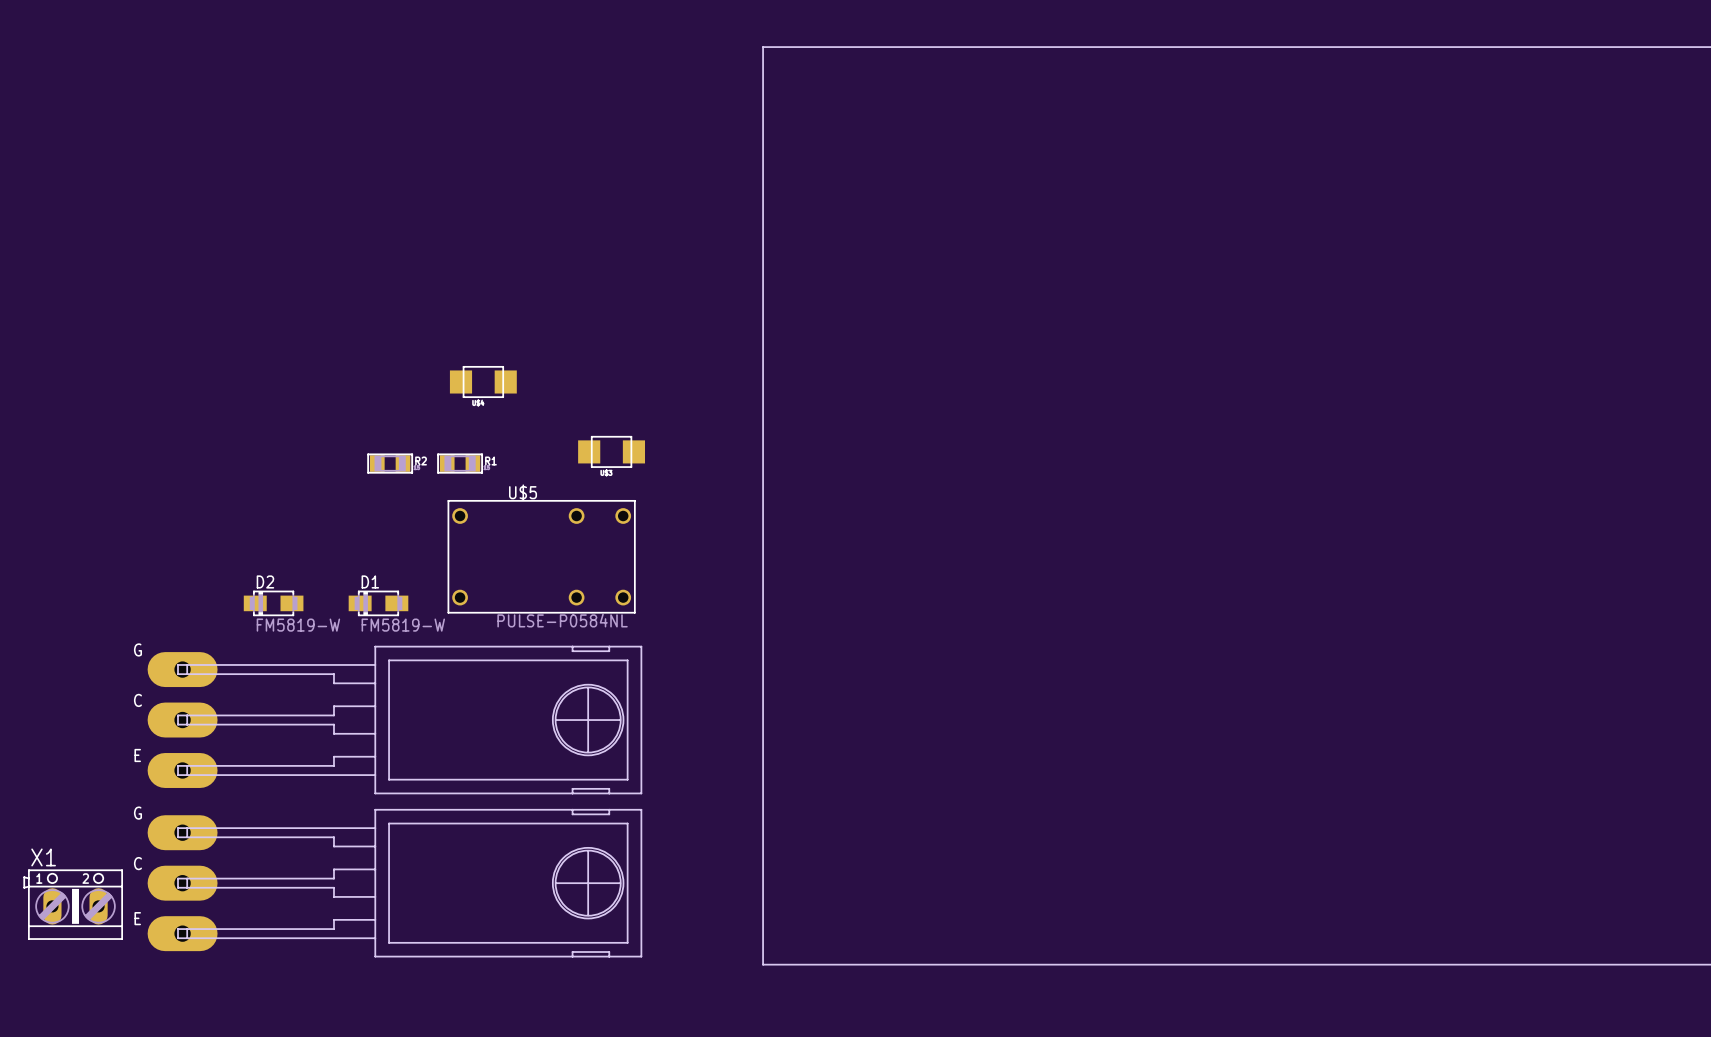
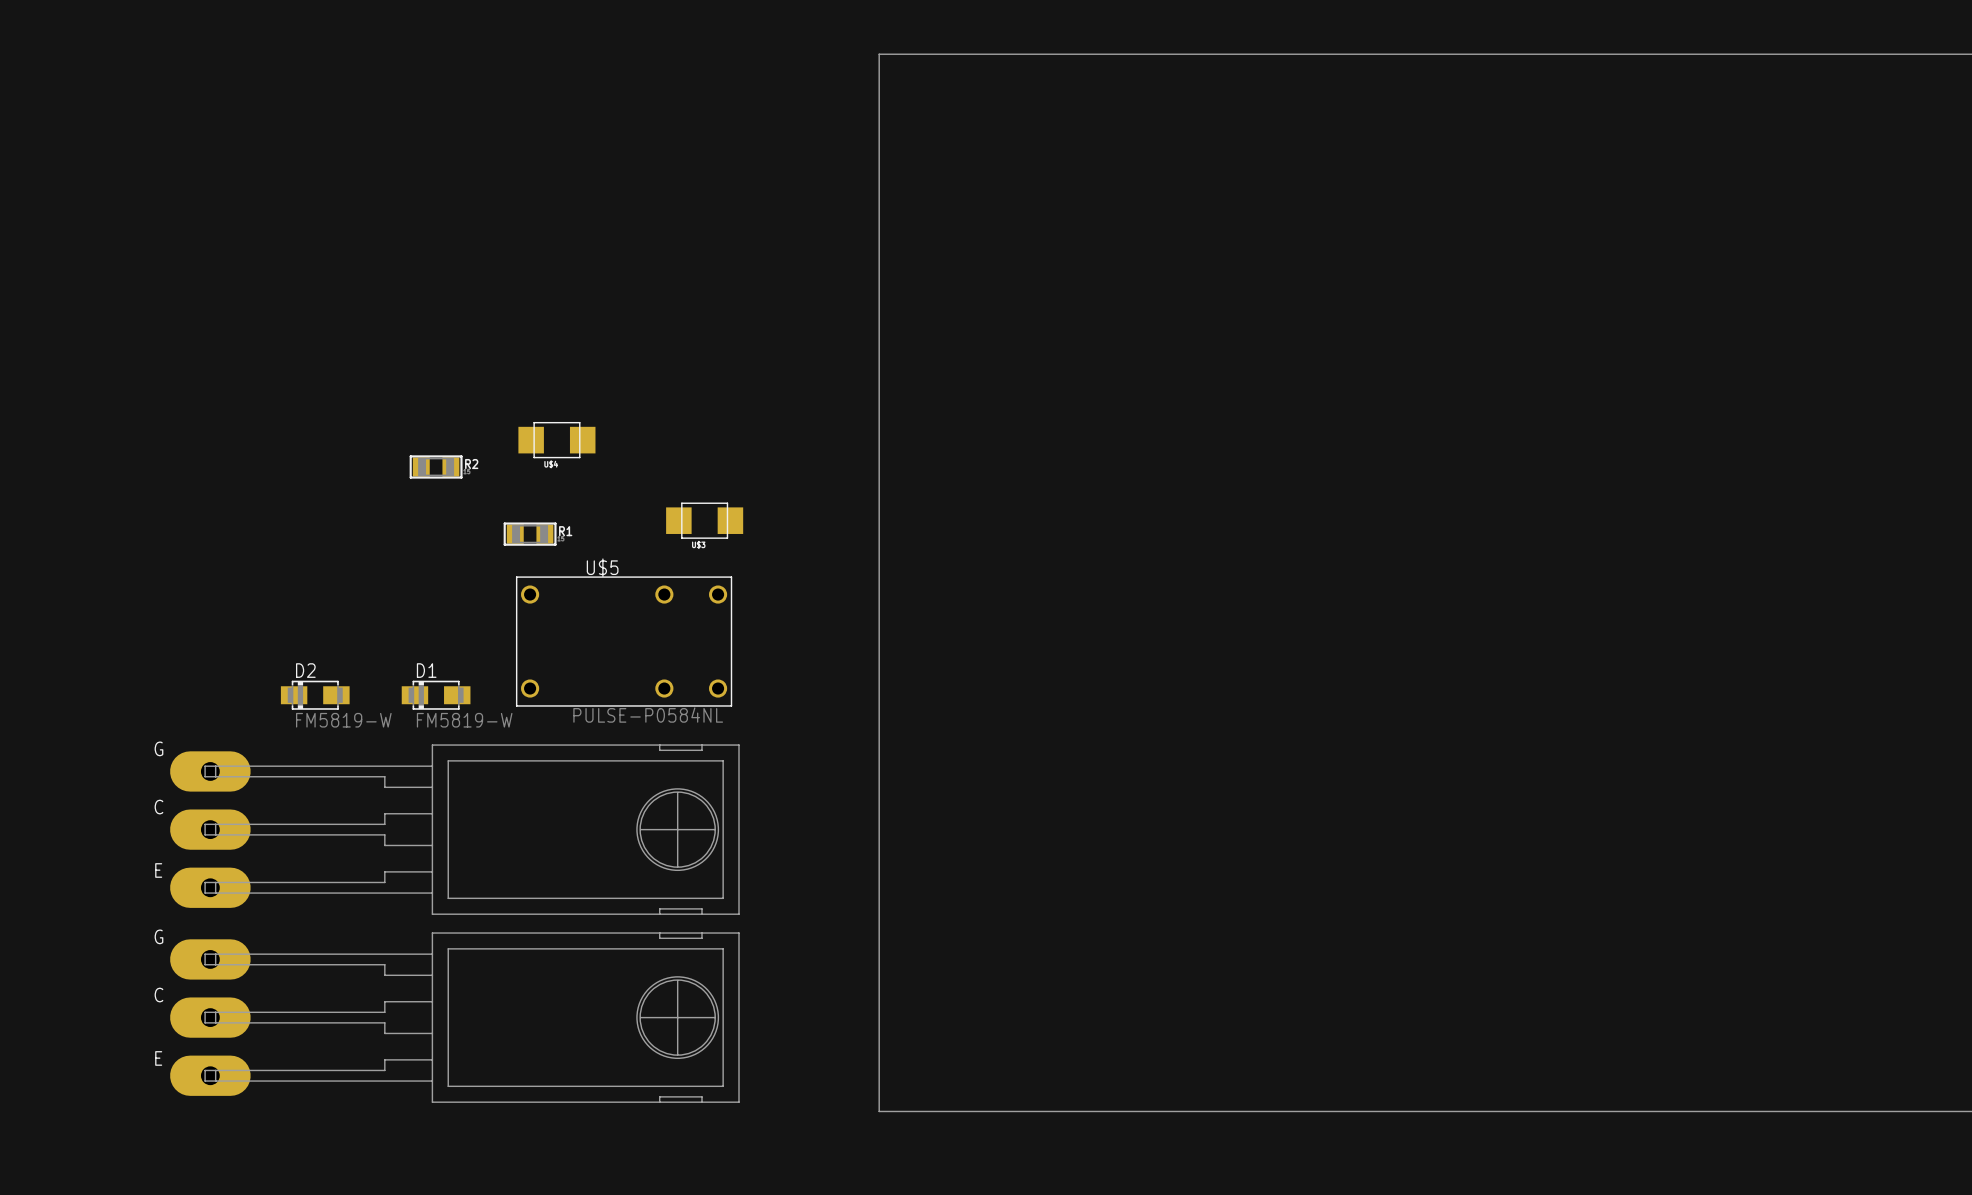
R2 position: (390, 463) -> (436, 466)
X1: (73, 904) -> none

